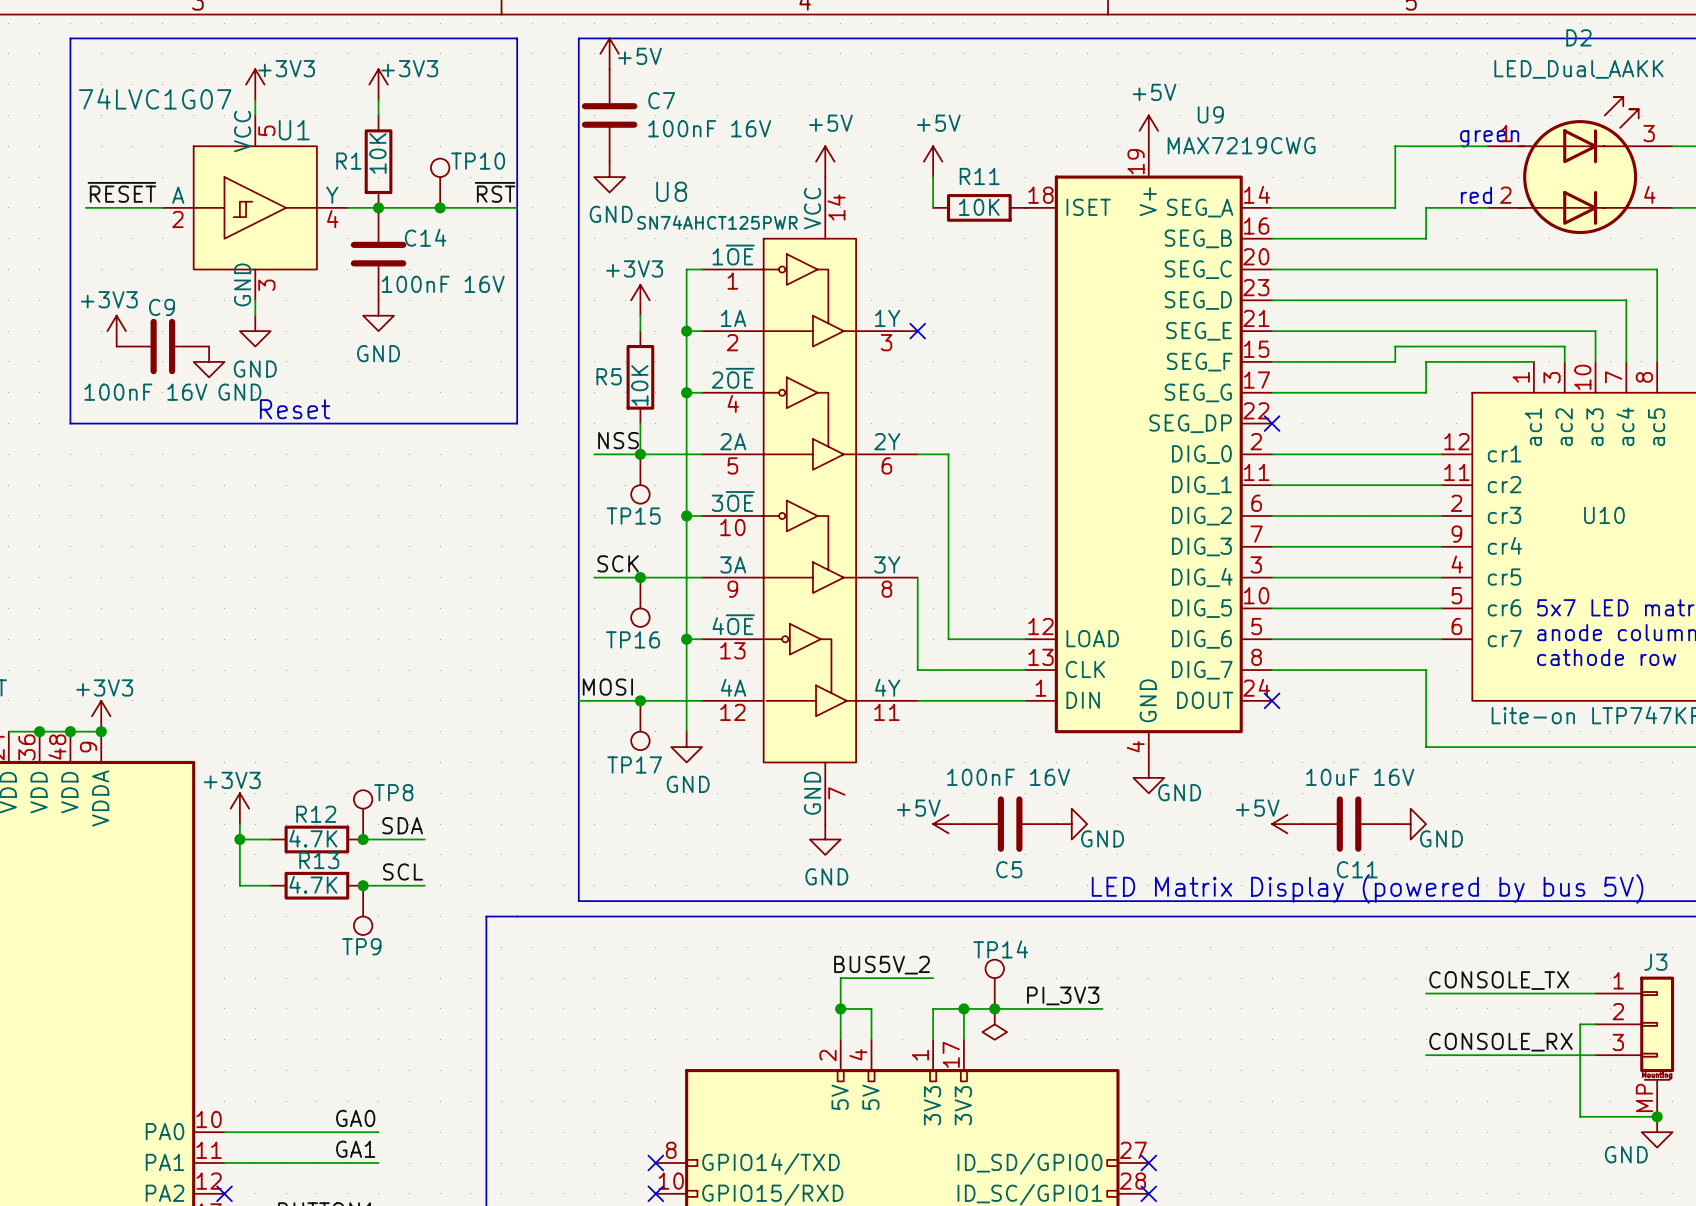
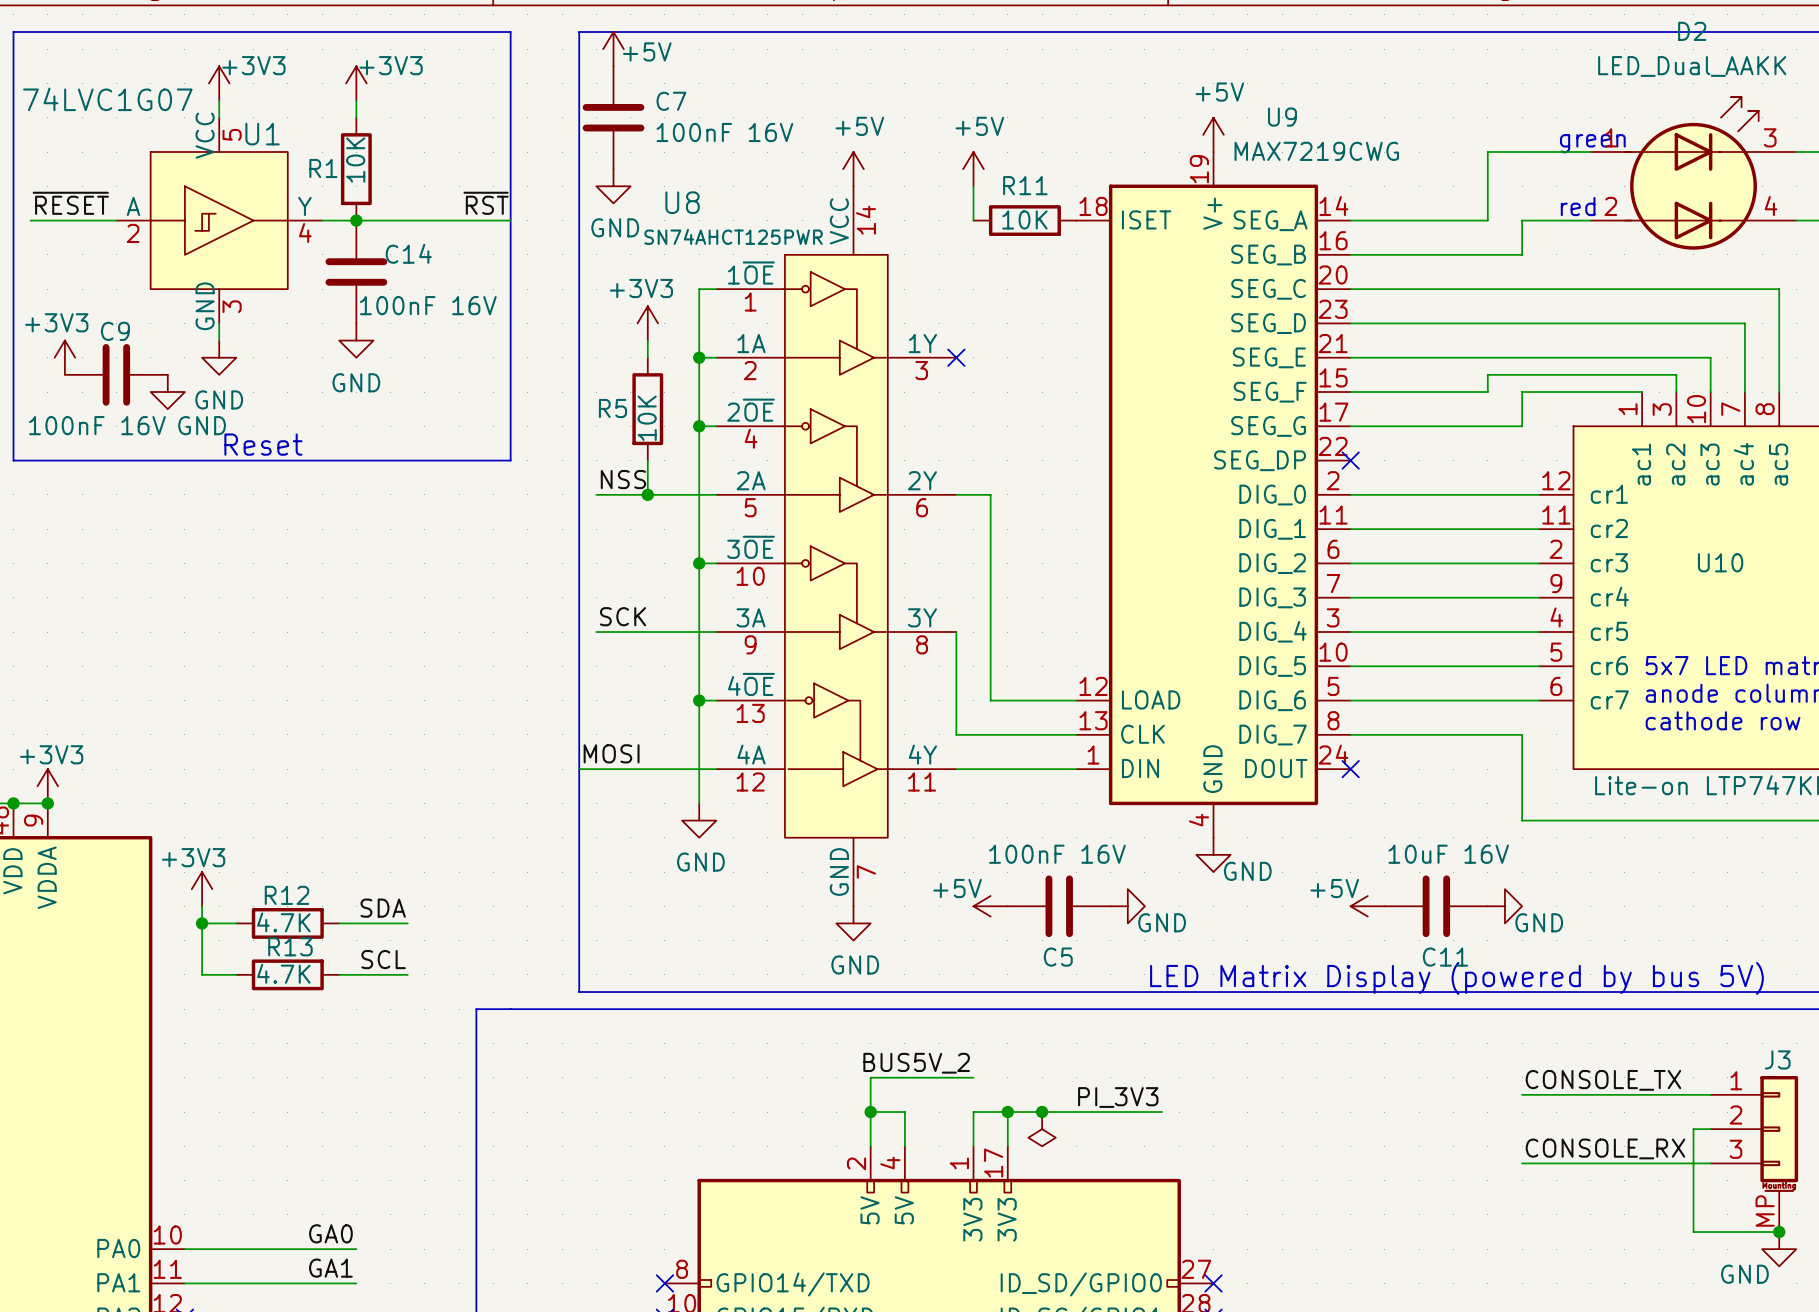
TP10: (440, 183) -> none
junction: (440, 207) -> none
TP15: (640, 479) -> none
junction: (640, 577) -> none
TP16: (640, 602) -> none
junction: (640, 700) -> none
TP17: (640, 725) -> none
TP8: (363, 814) -> none
junction: (363, 839) -> none
junction: (363, 885) -> none
TP9: (363, 910) -> none
TP14: (994, 984) -> none

